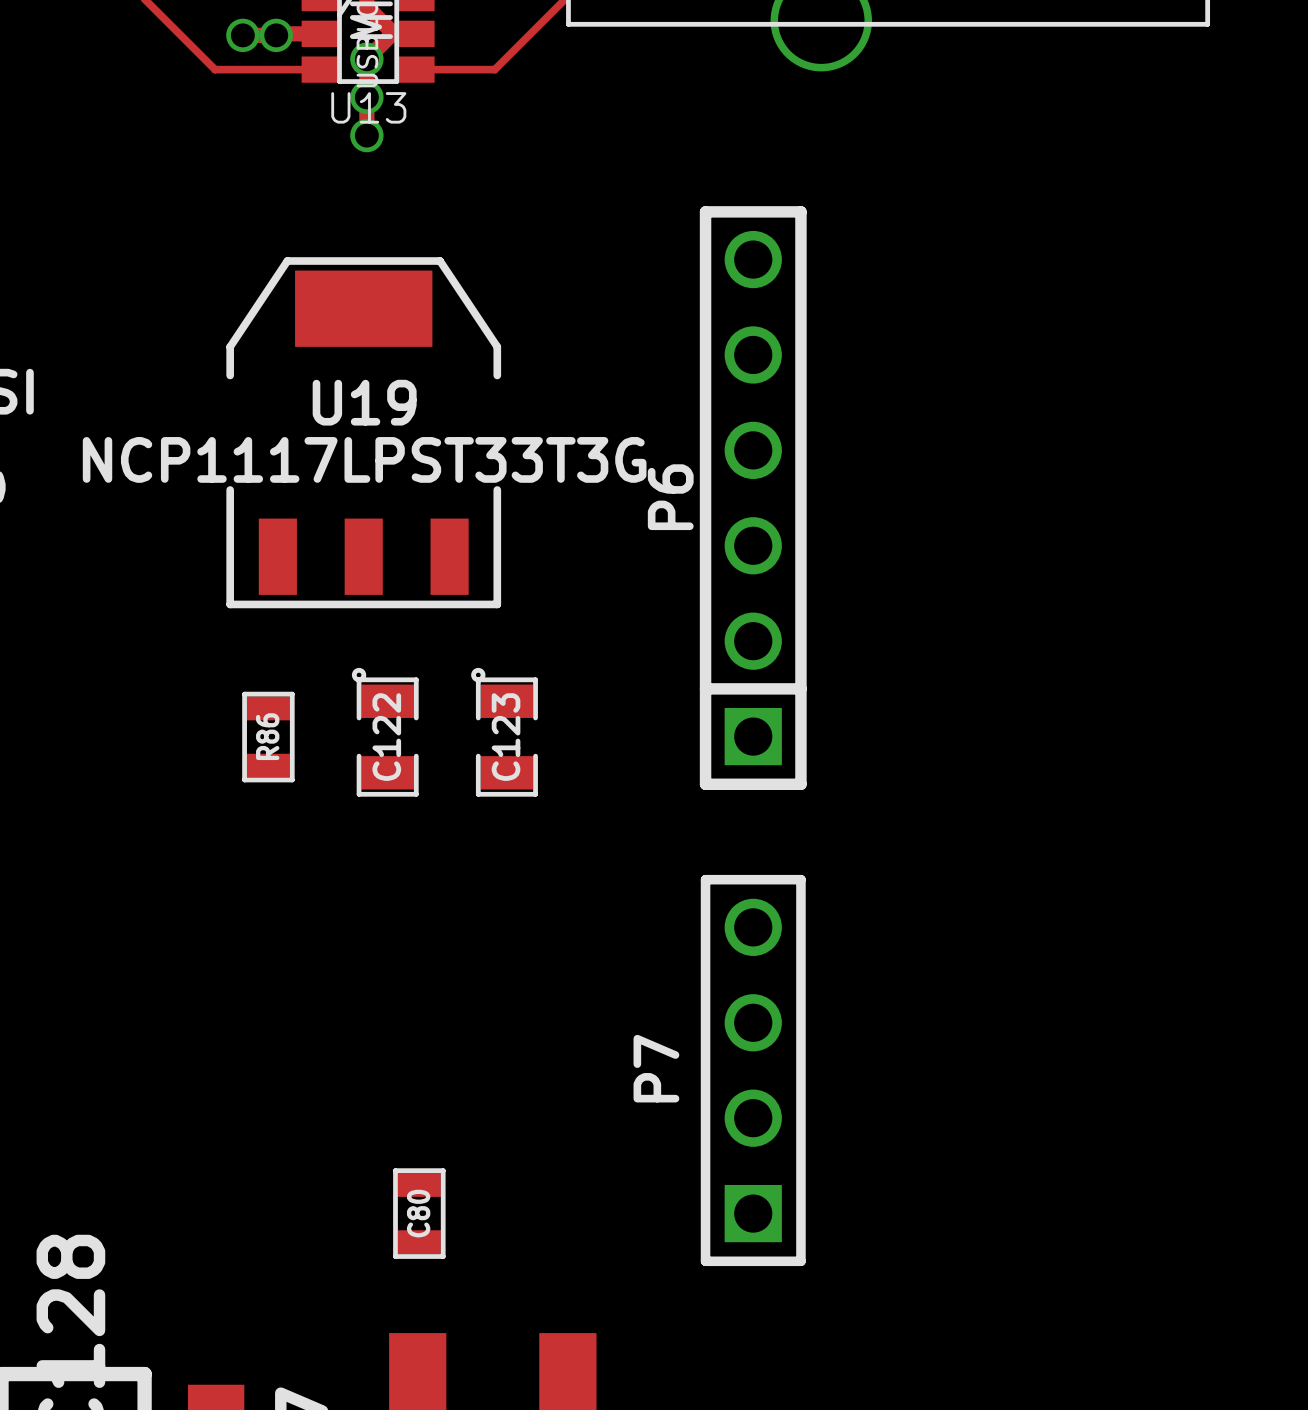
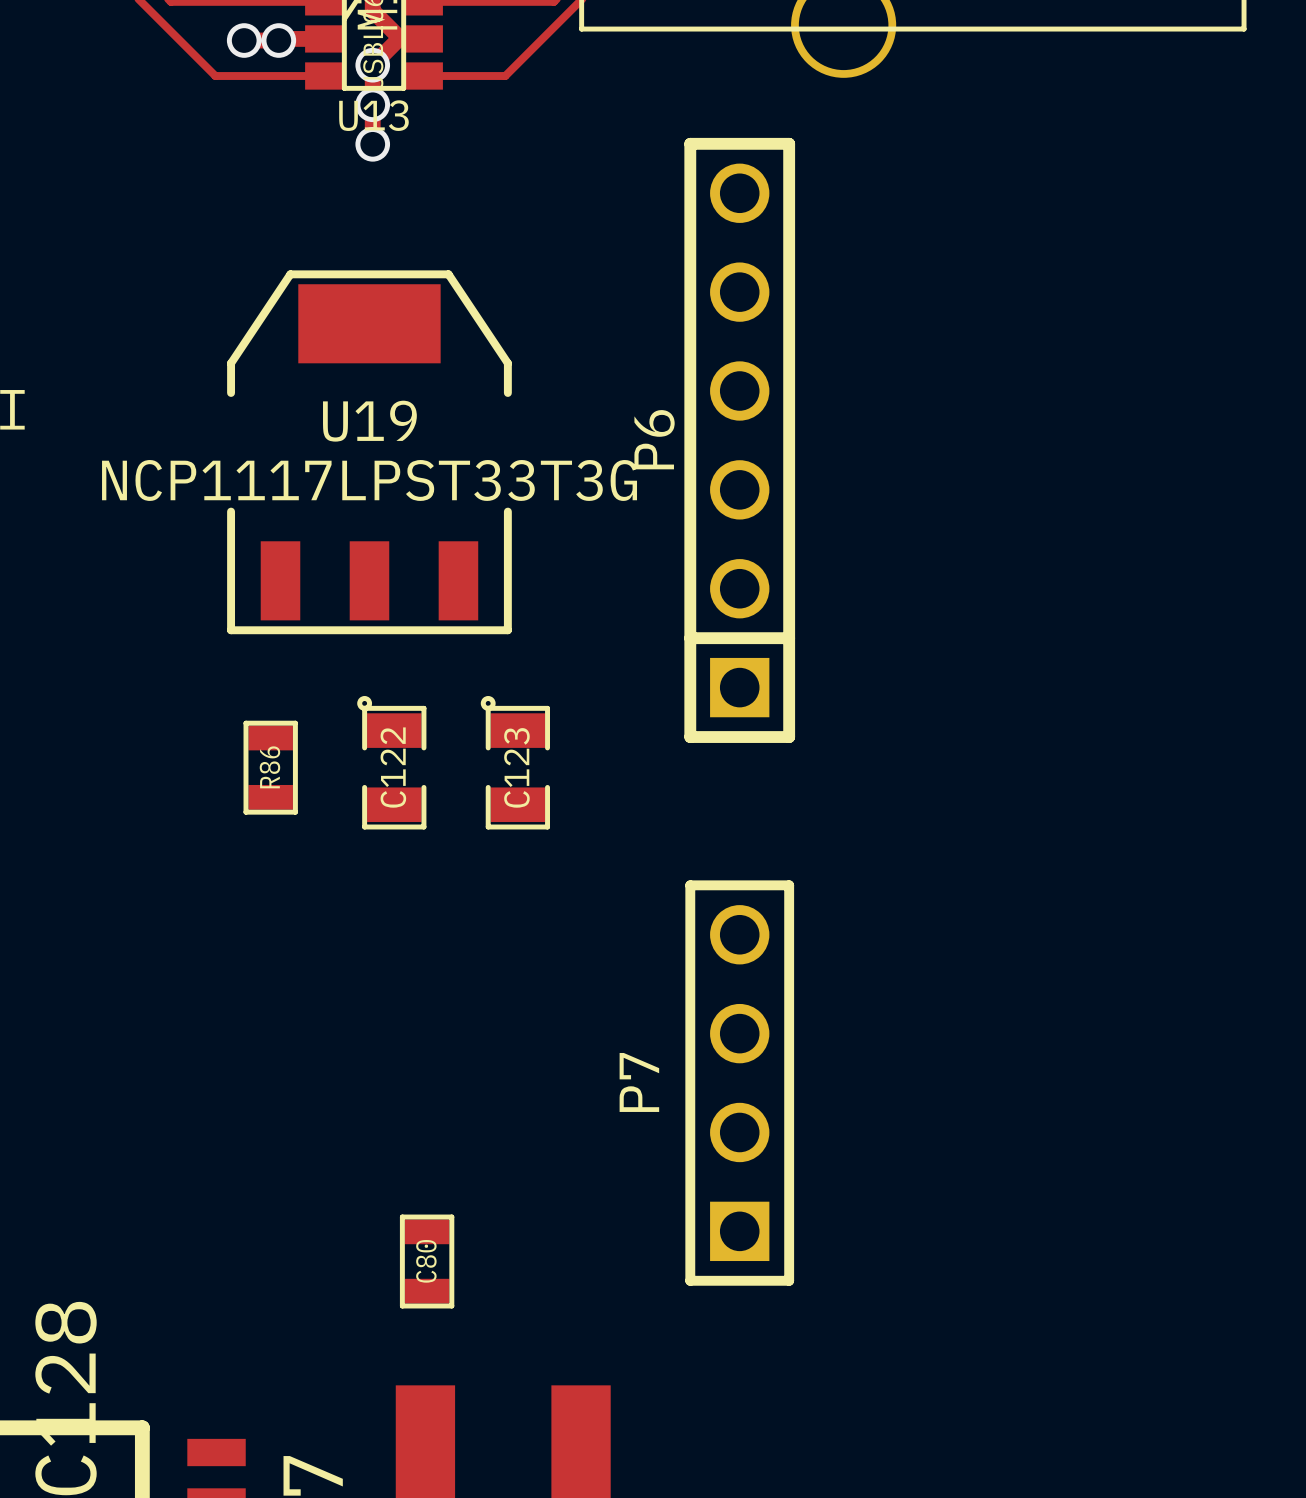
P6 position: (753, 498) -> (739, 440)
P7 position: (753, 1070) -> (739, 1083)

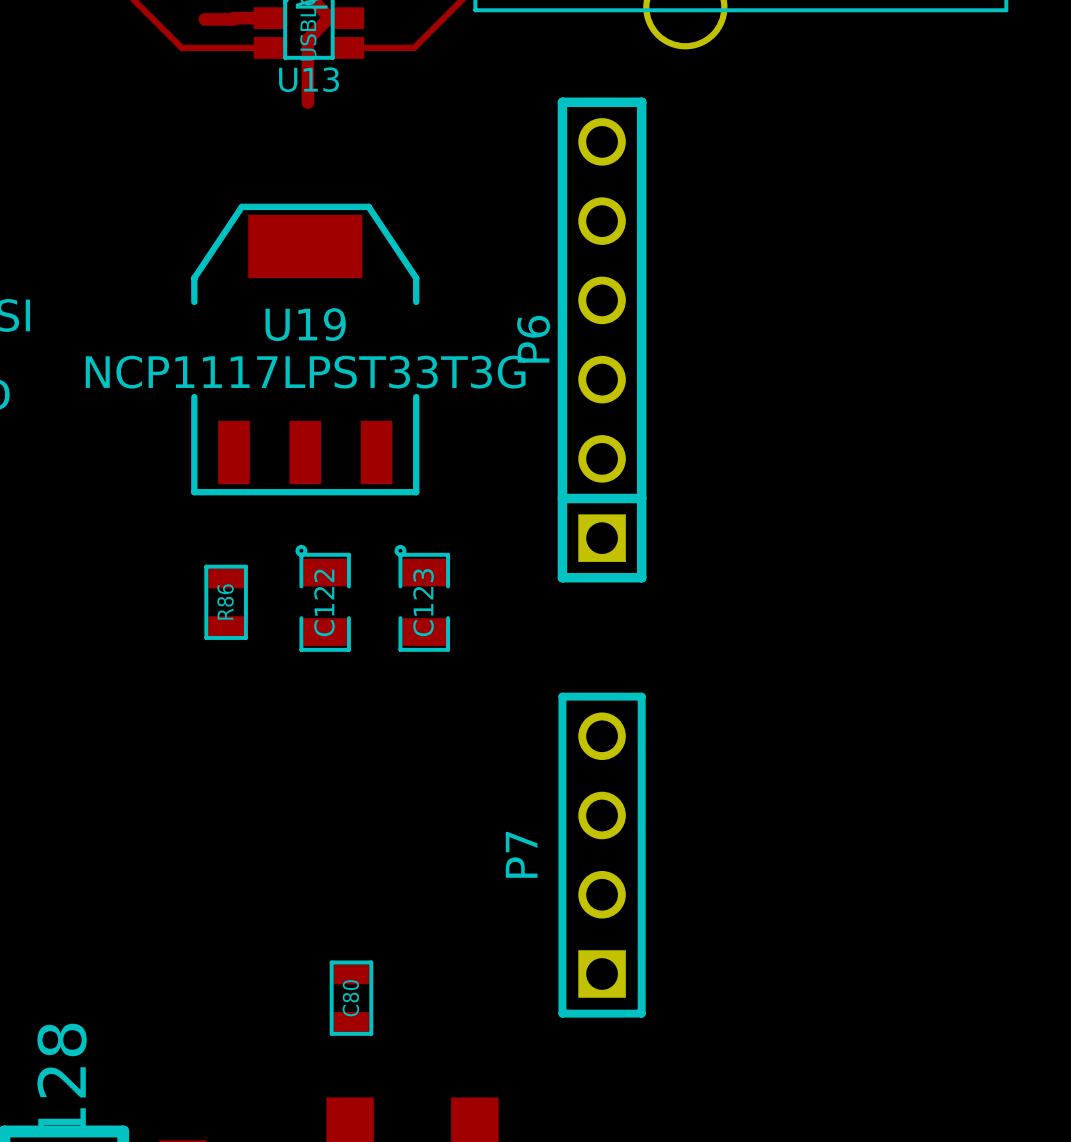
via: (244, 40) -> none
via: (278, 40) -> none
via: (372, 65) -> none
via: (372, 104) -> none
via: (372, 144) -> none

